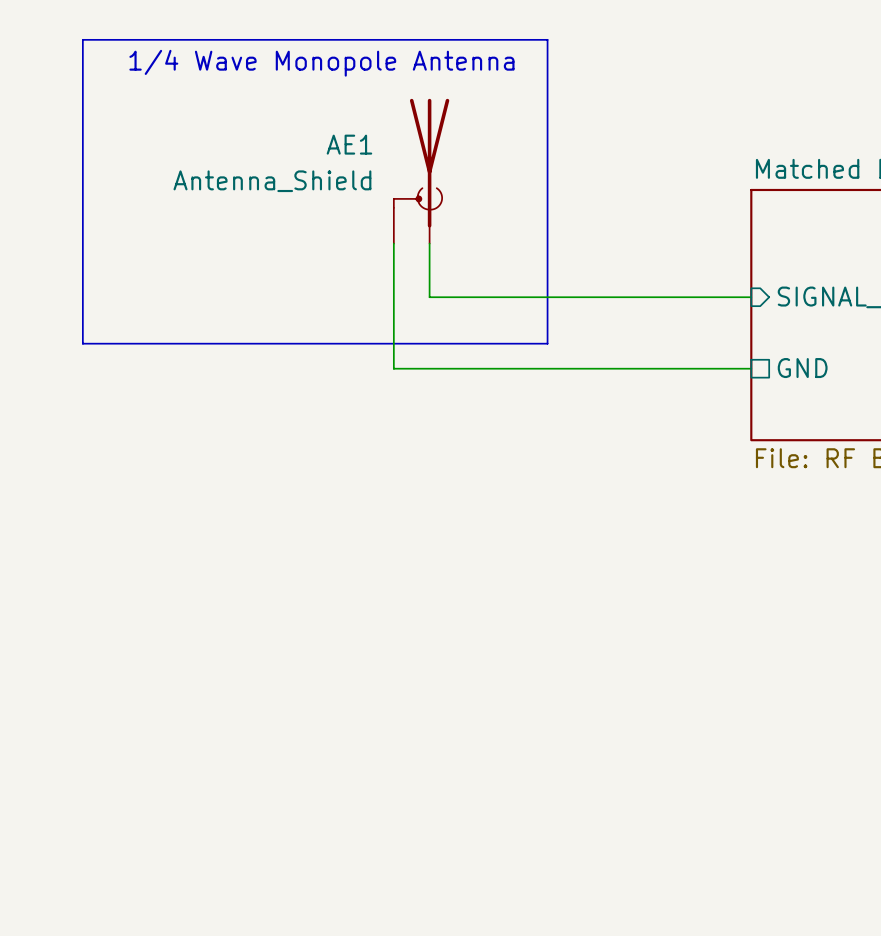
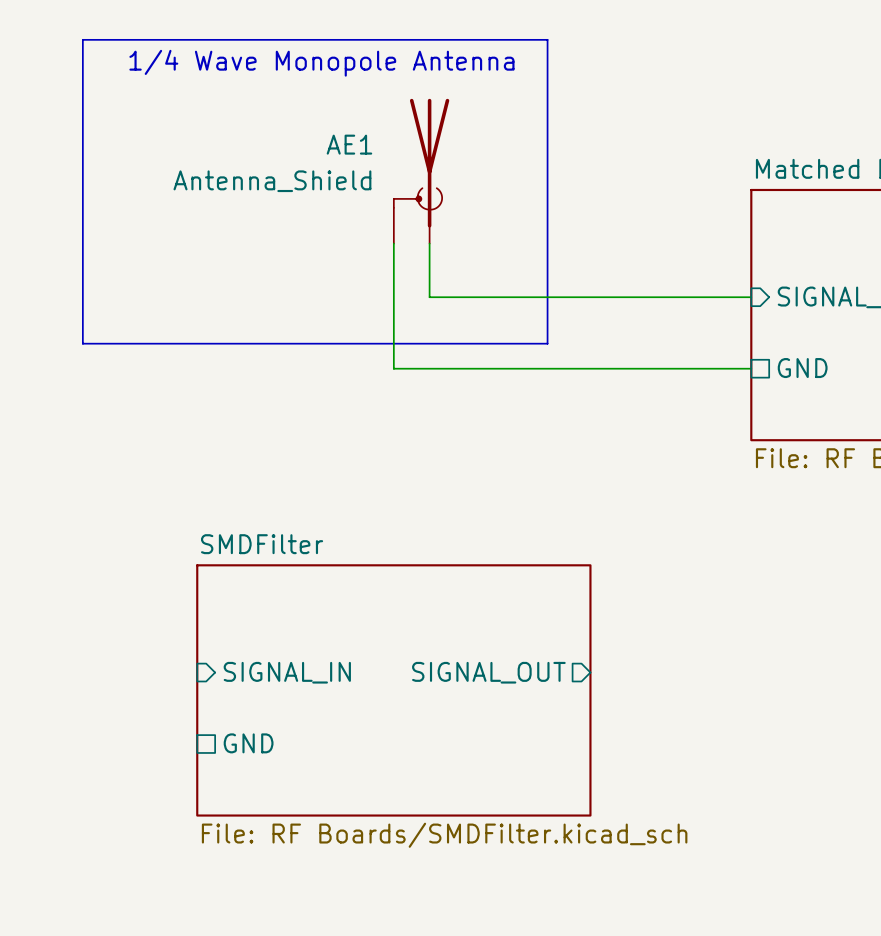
sheet pin: none -> SIGNAL_IN (287, 672)
sheet pin: none -> SIGNAL_OUT (488, 672)
sheet SMDFilter: none -> File: RF Boards/SMDFilter.kicad_sch (393, 690)
sheet pin: none -> GND (248, 743)

